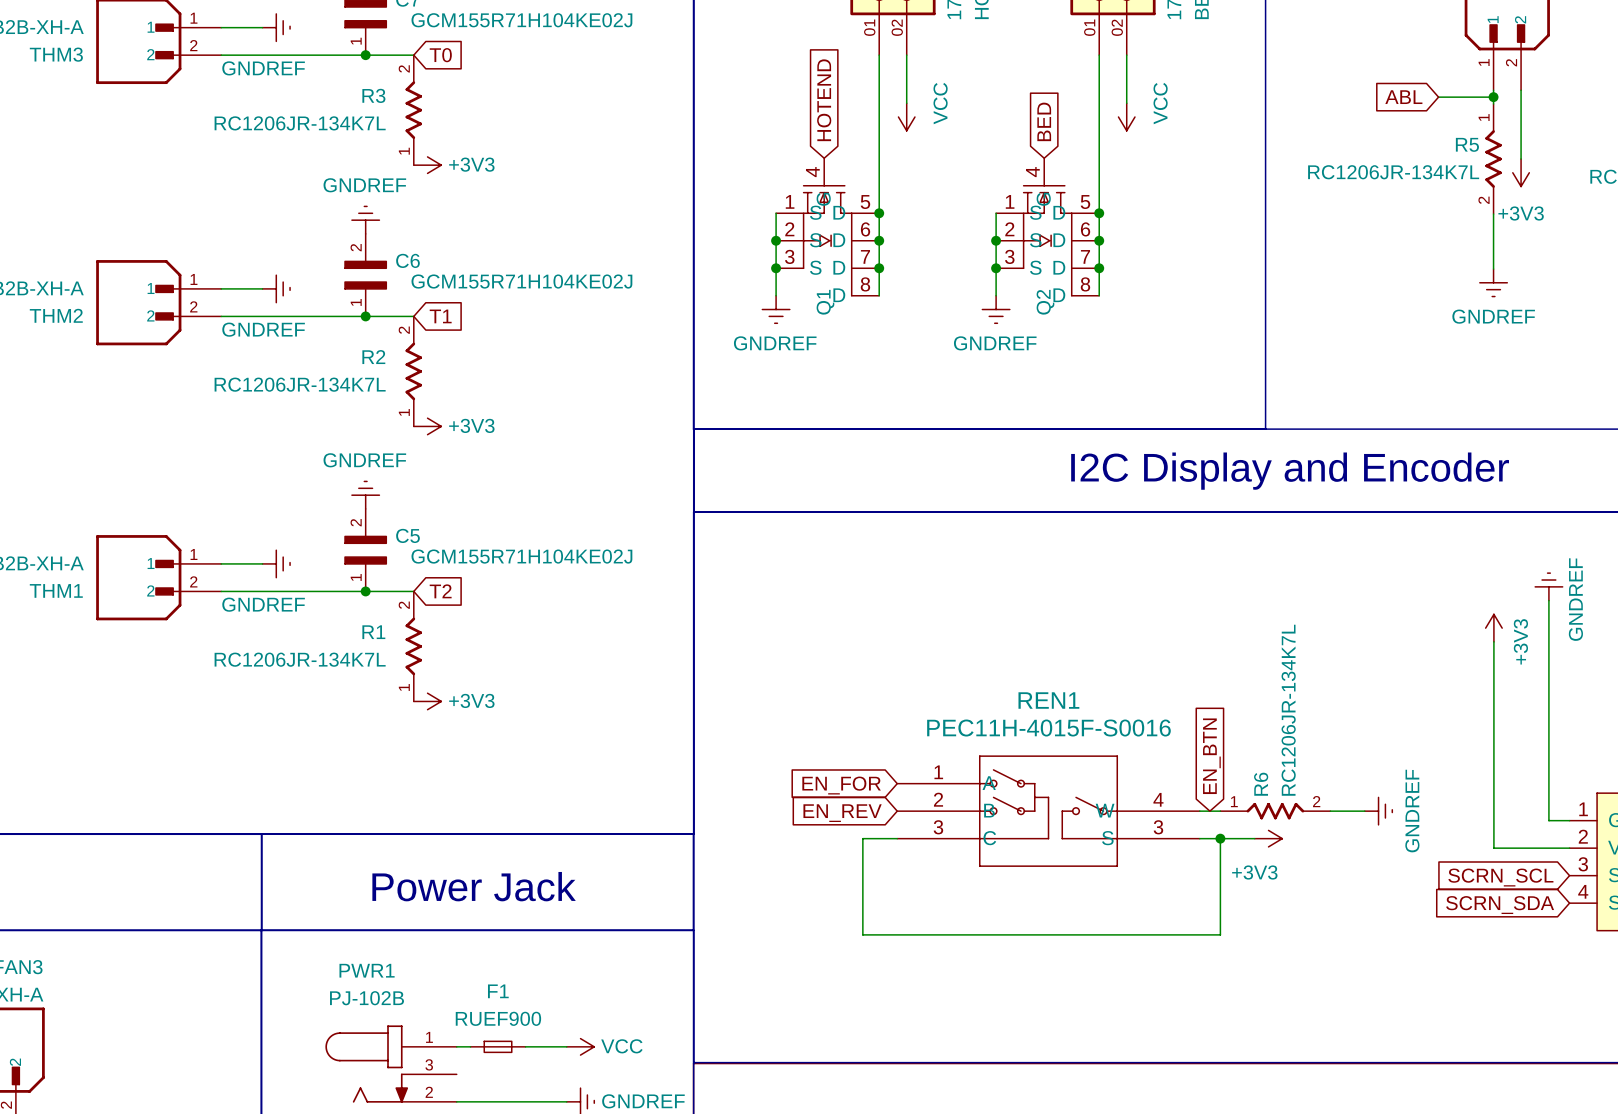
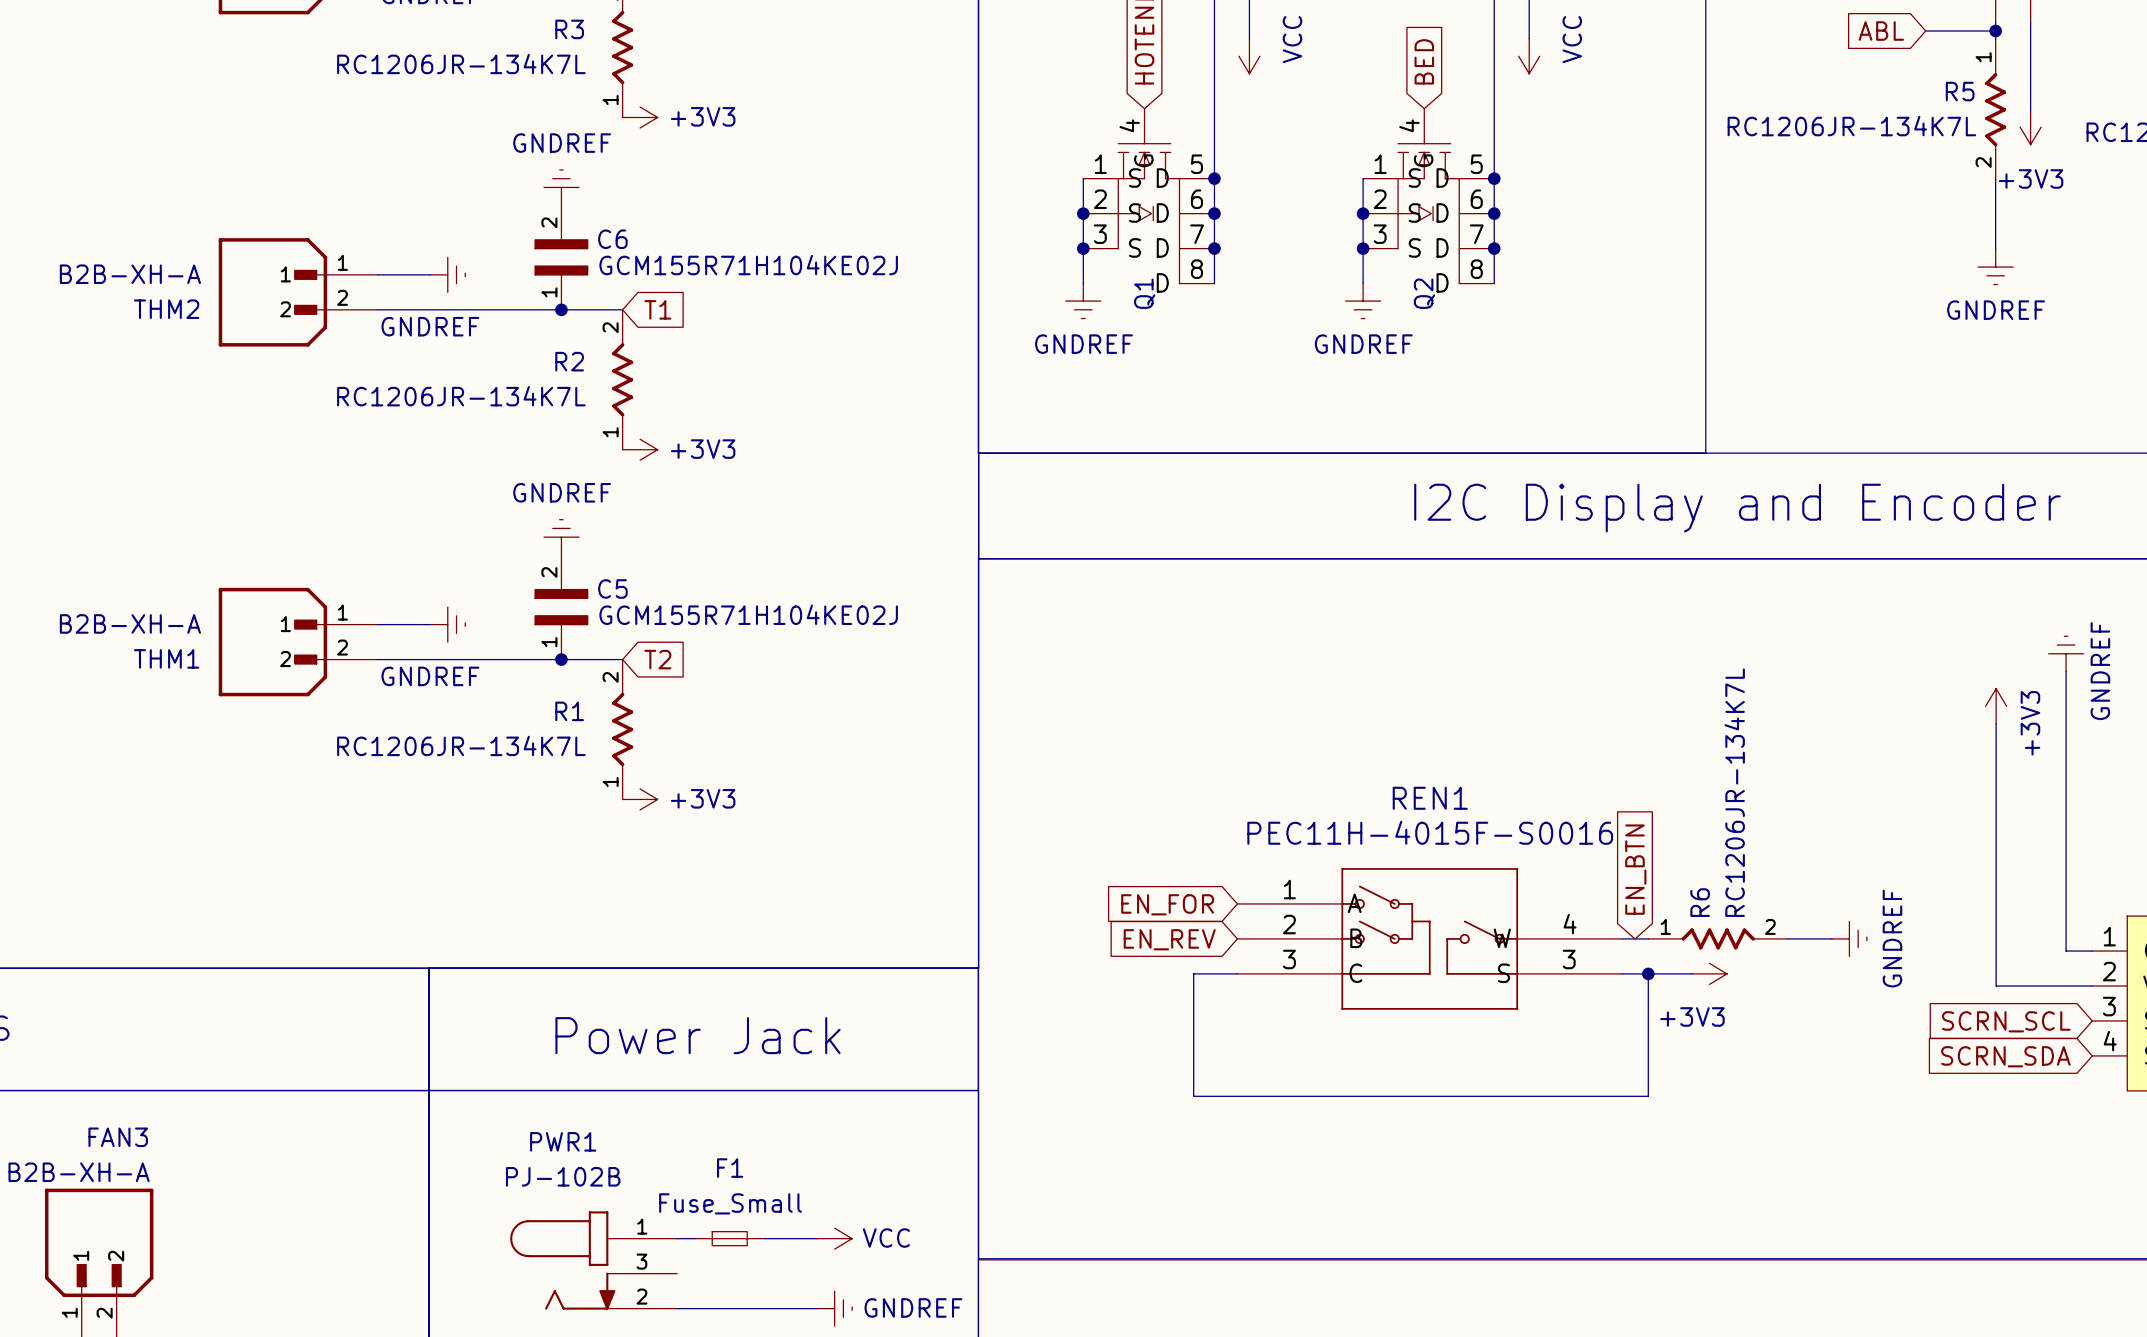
F1 value: RUEF900 (498, 1018) -> Fuse_Small (730, 1203)

